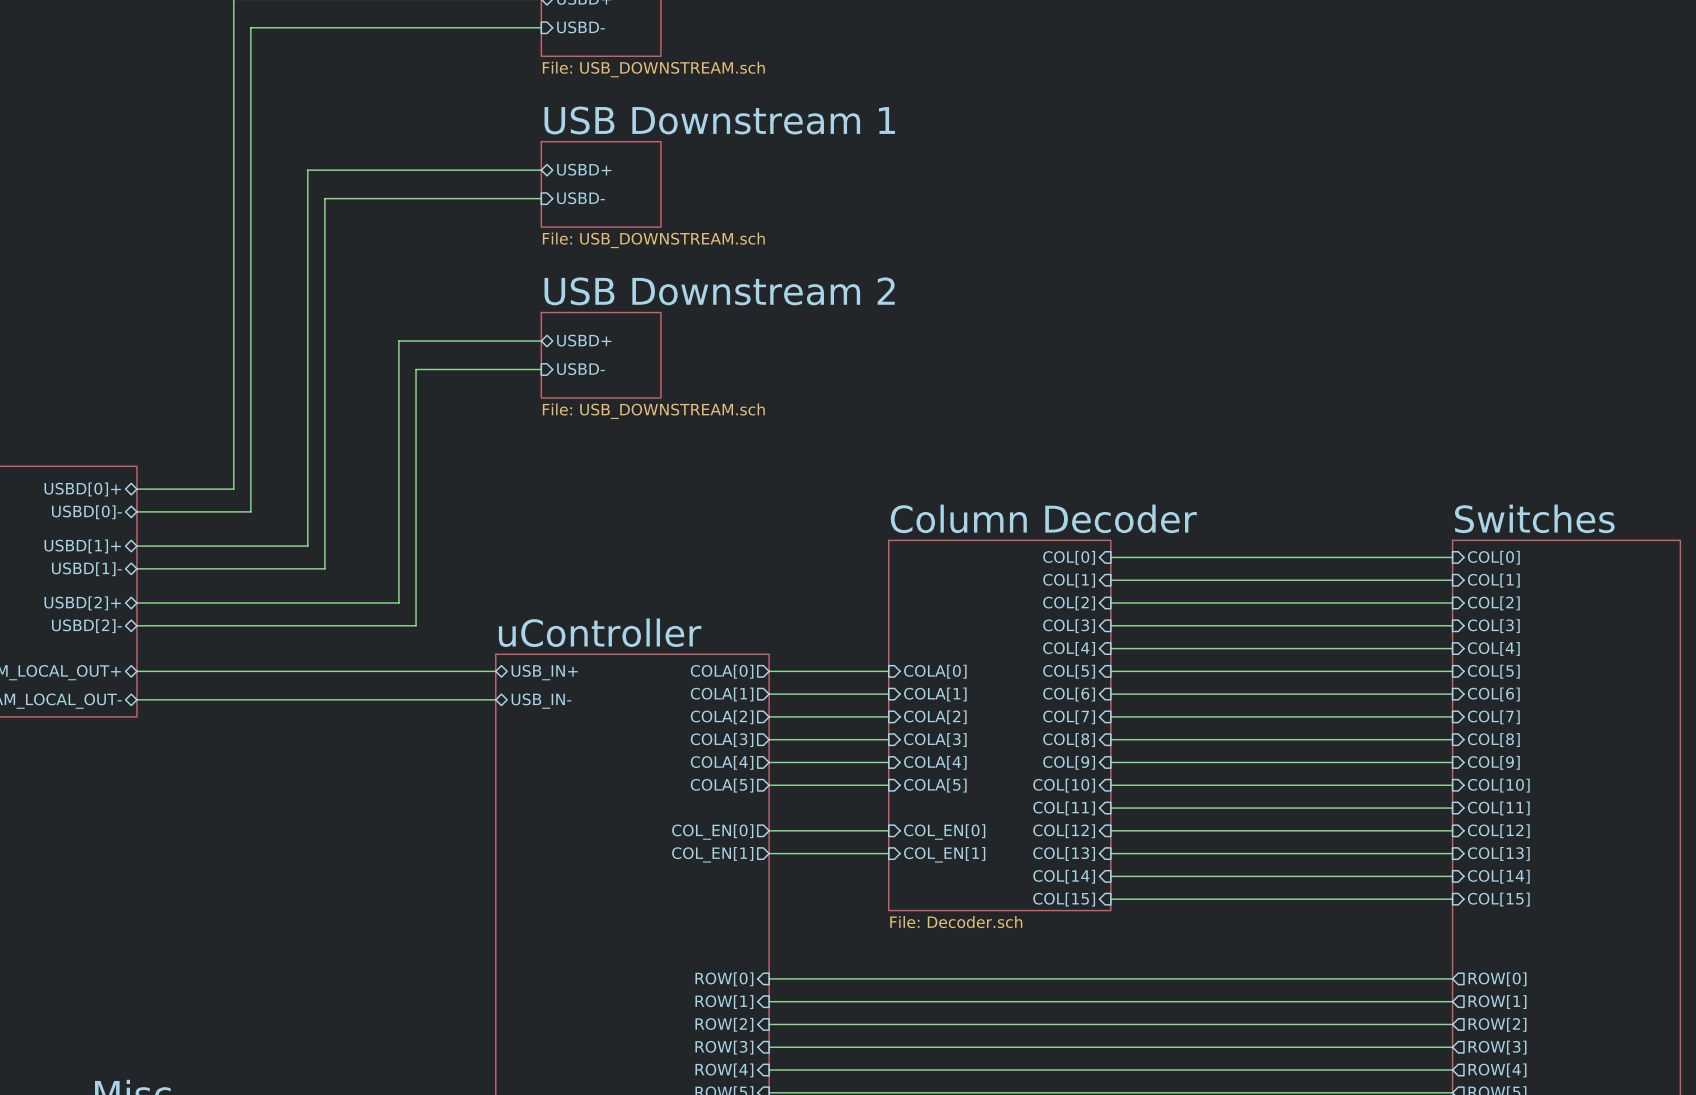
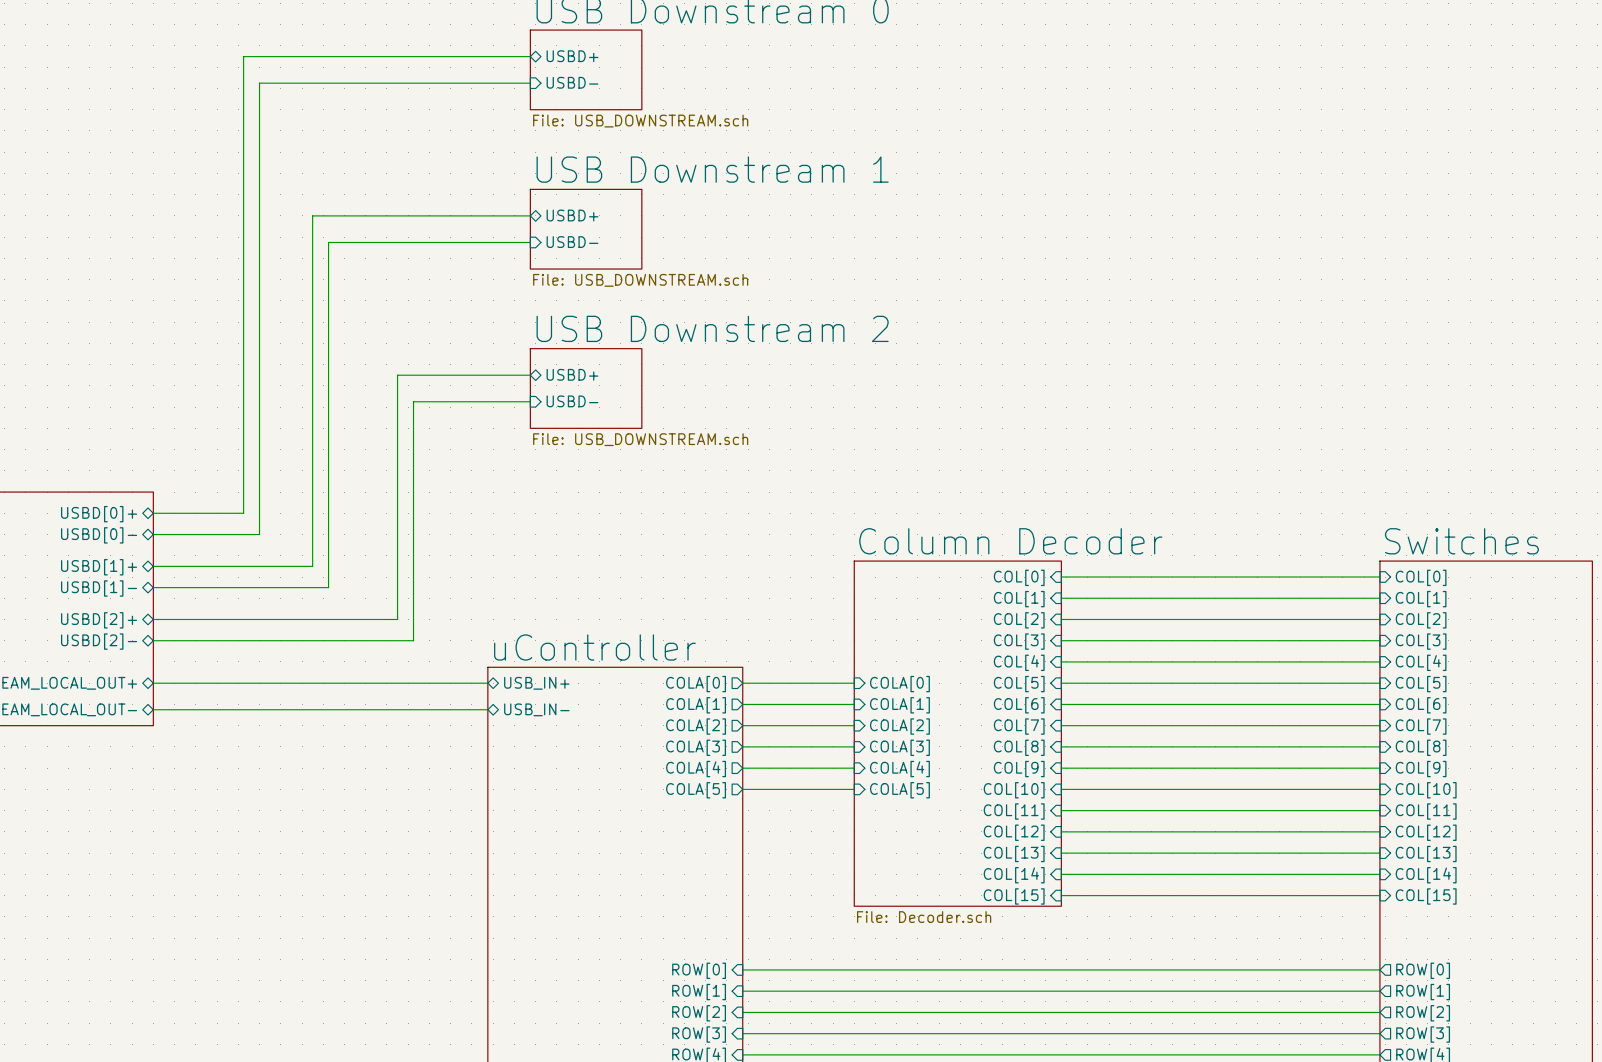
wire: (769, 830) (888, 830) -> none
sheet pin: COL_EN[0] (712, 832) -> none
sheet pin: COL_EN[0] (944, 832) -> none
wire: (769, 853) (888, 853) -> none
sheet pin: COL_EN[1] (712, 854) -> none
sheet pin: COL_EN[1] (944, 854) -> none

